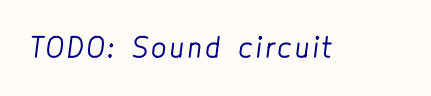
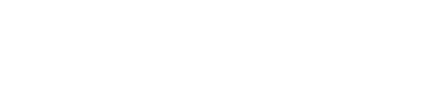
text: TODO: Sound circuit (181, 46) -> none

